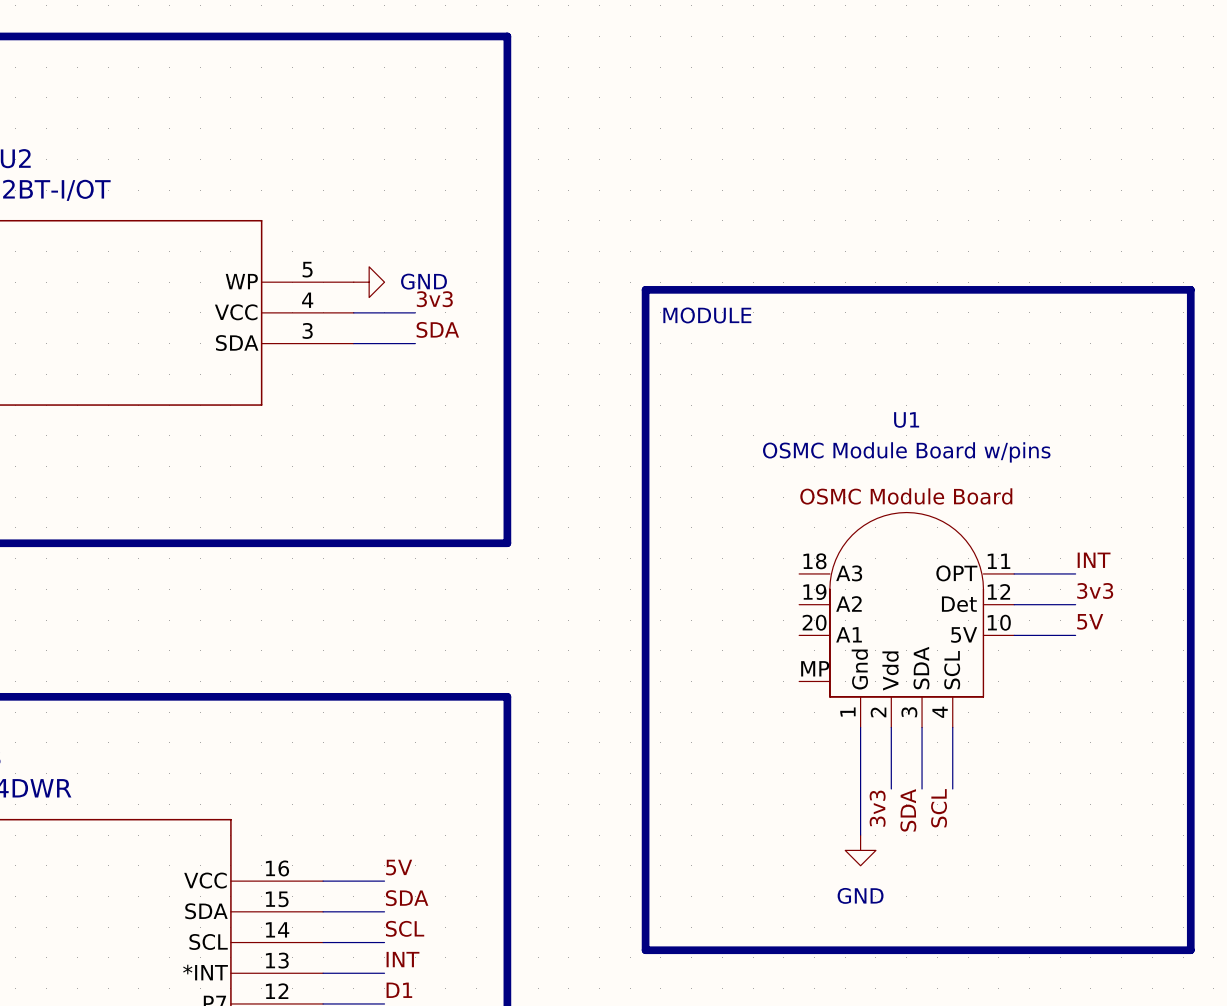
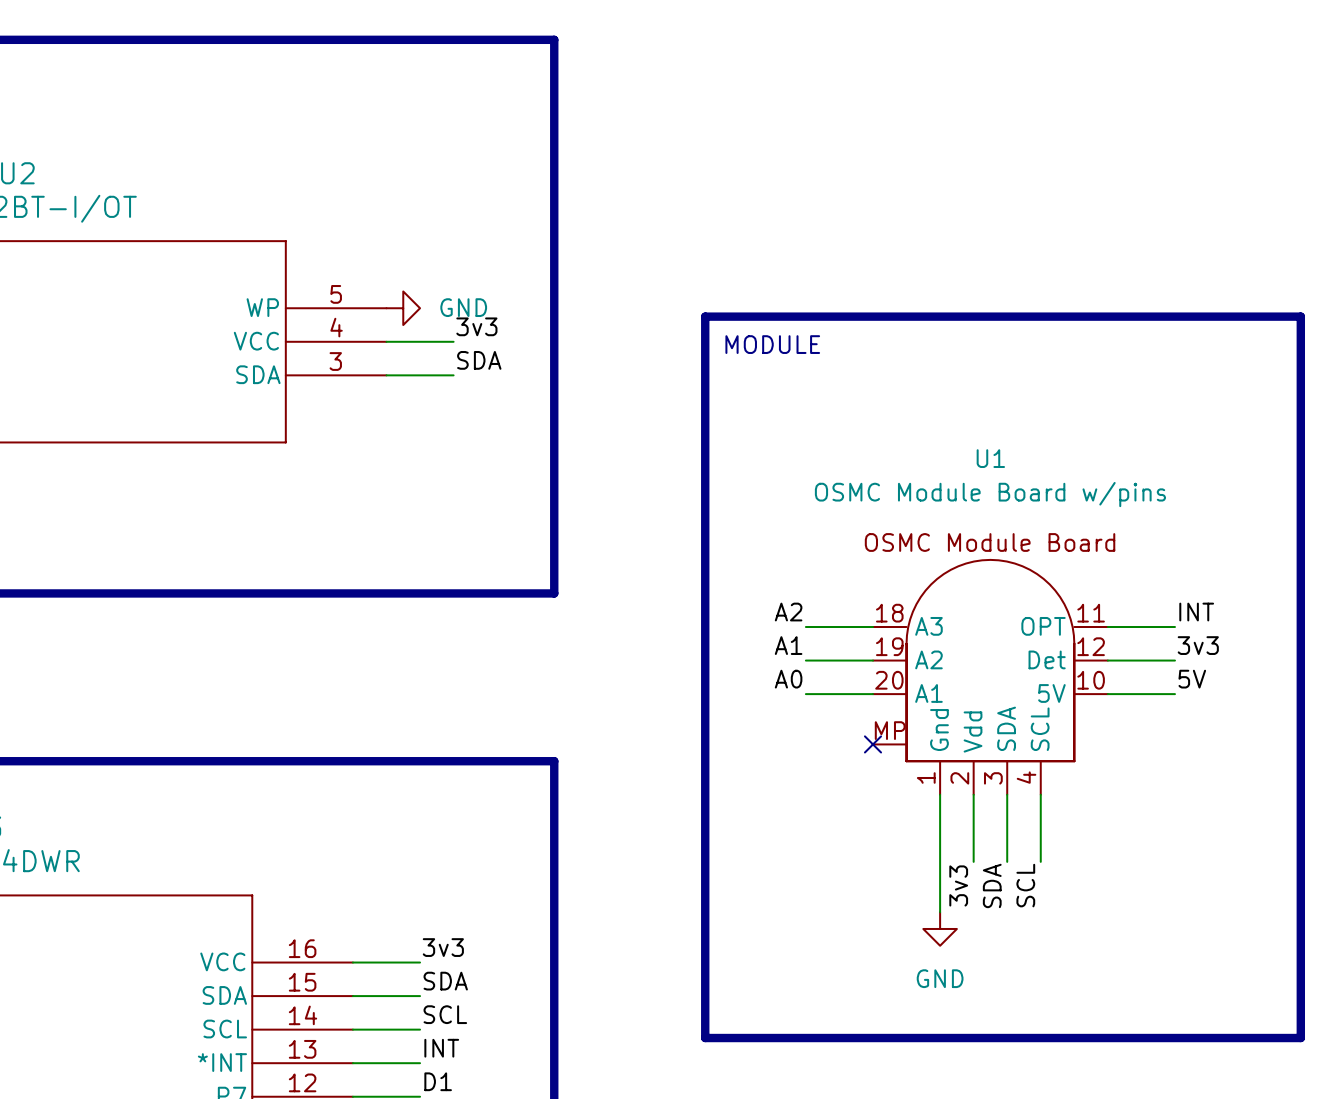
label: none -> A2 (788, 612)
wire: none -> (805, 627) (873, 627)
label: none -> A1 (788, 645)
wire: none -> (805, 660) (873, 660)
label: none -> A0 (788, 679)
wire: none -> (805, 694) (873, 694)
no-connect mark: none -> (873, 744)
label: 5V (399, 867) -> 3v3 (443, 947)

